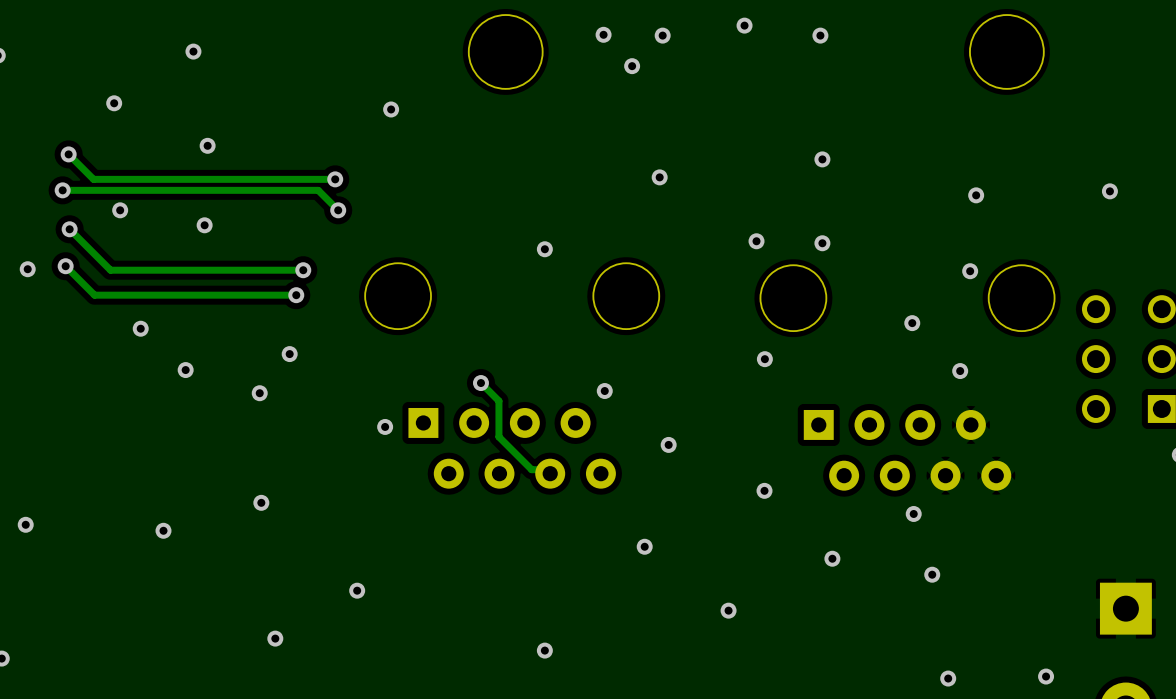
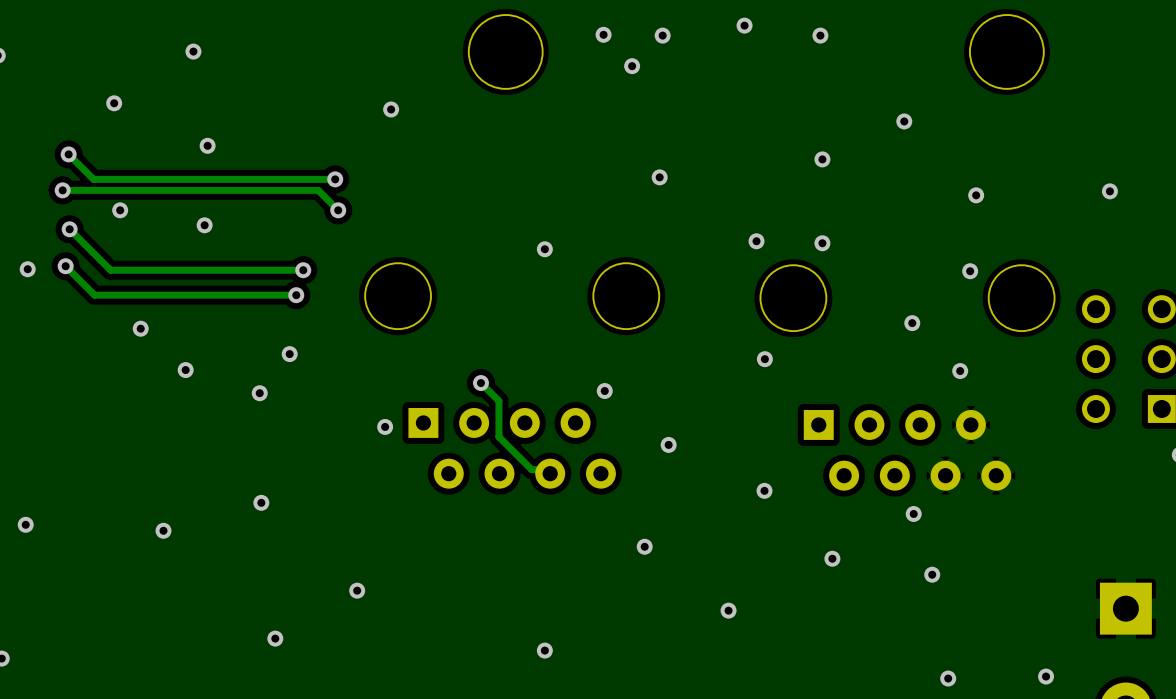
via: none -> (904, 121)

